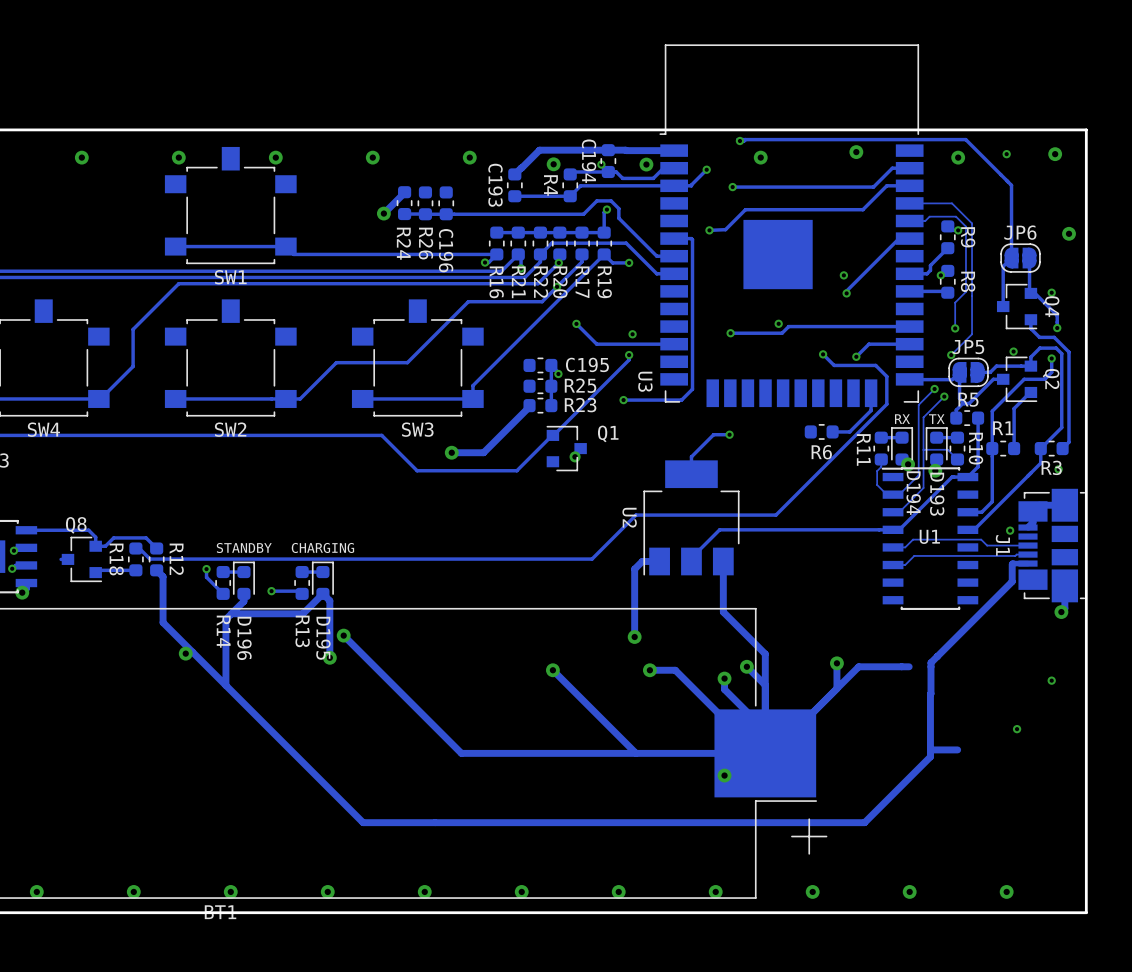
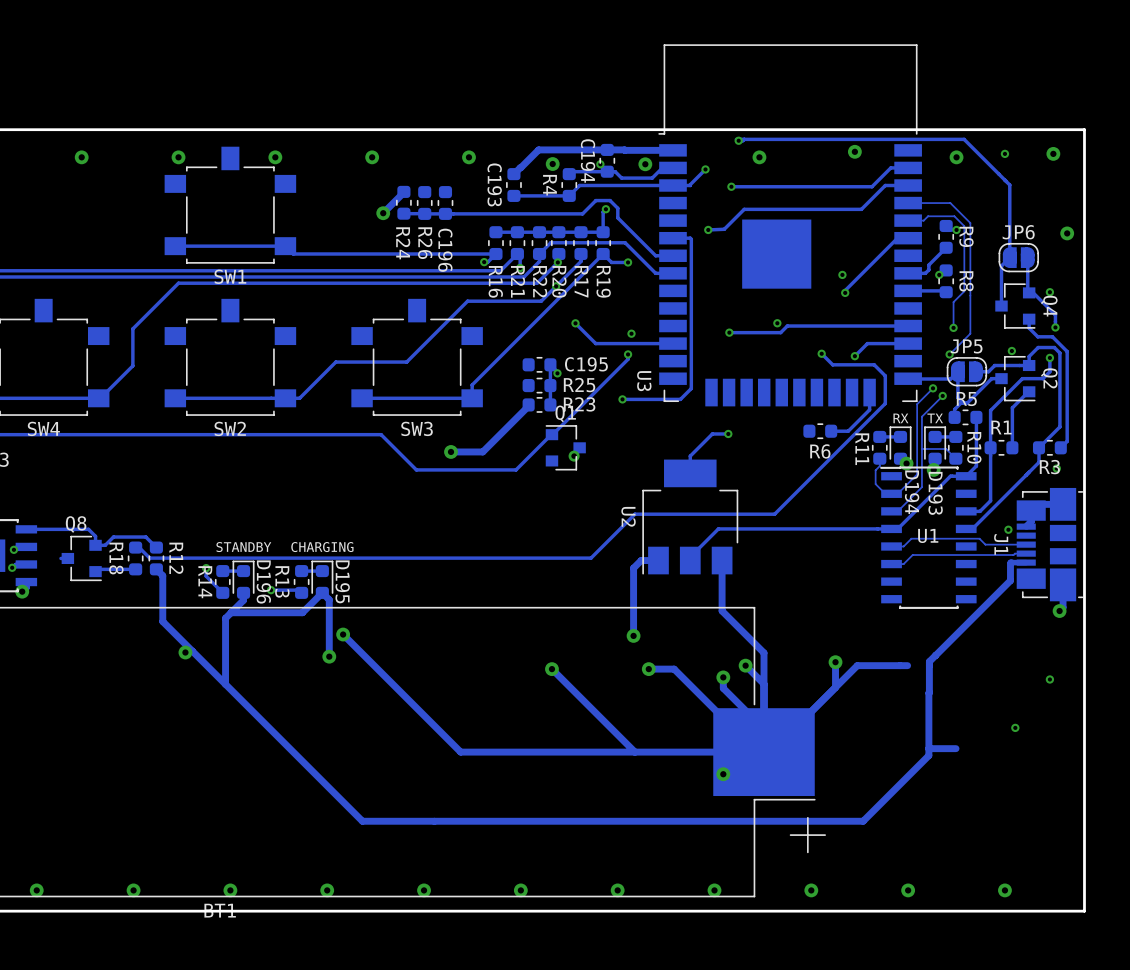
Q1 name position: Q1 (608, 433) -> Q1 (565, 413)
R14 name position: R14 (223, 631) -> R14 (205, 582)
R13 name position: R13 (302, 631) -> R13 (282, 581)
D196 name position: D196 (244, 638) -> D196 (263, 581)
D195 name position: D195 (323, 638) -> D195 (342, 581)

